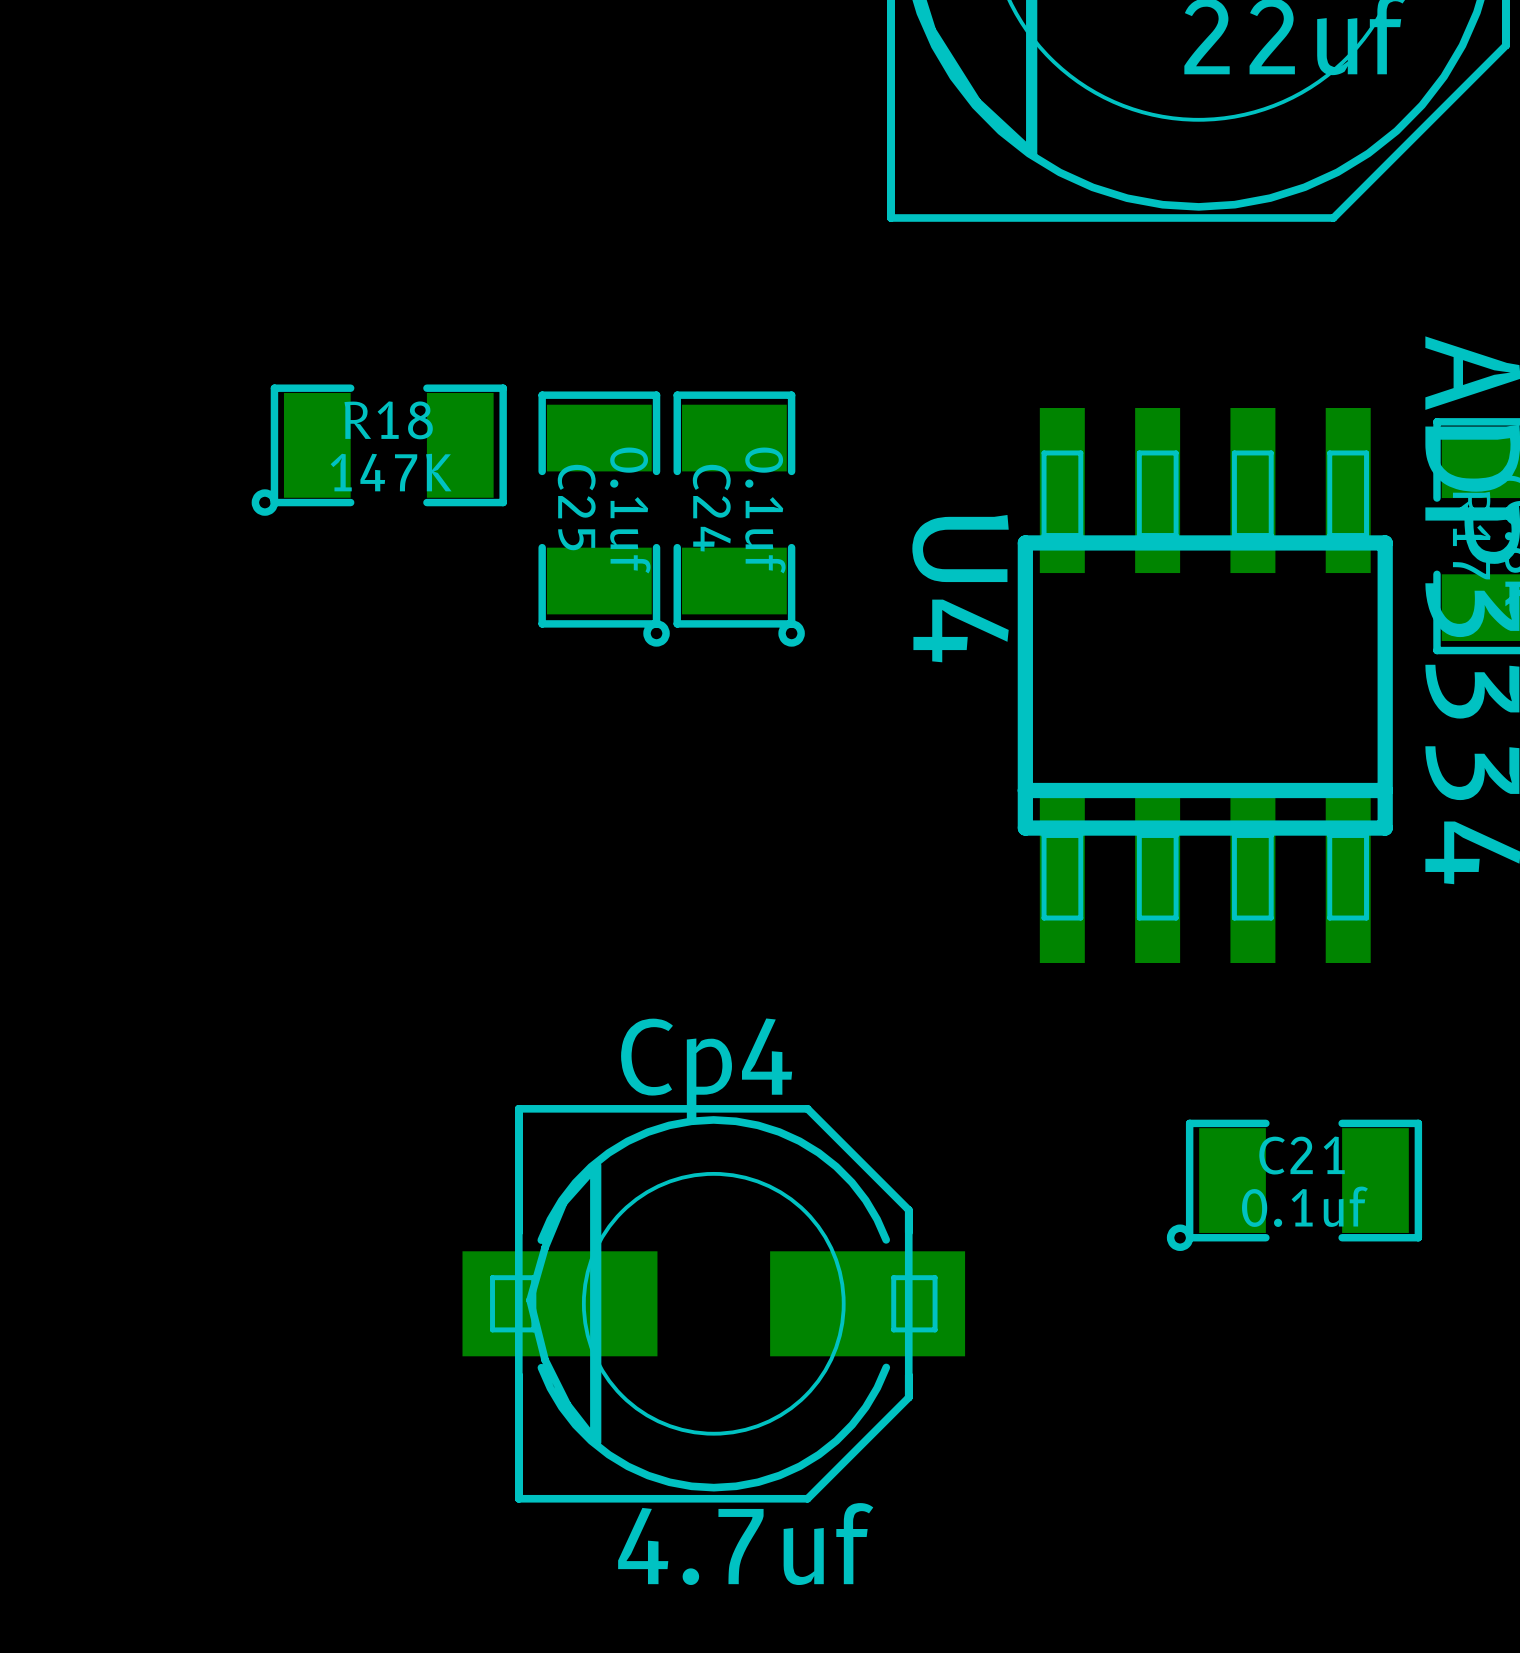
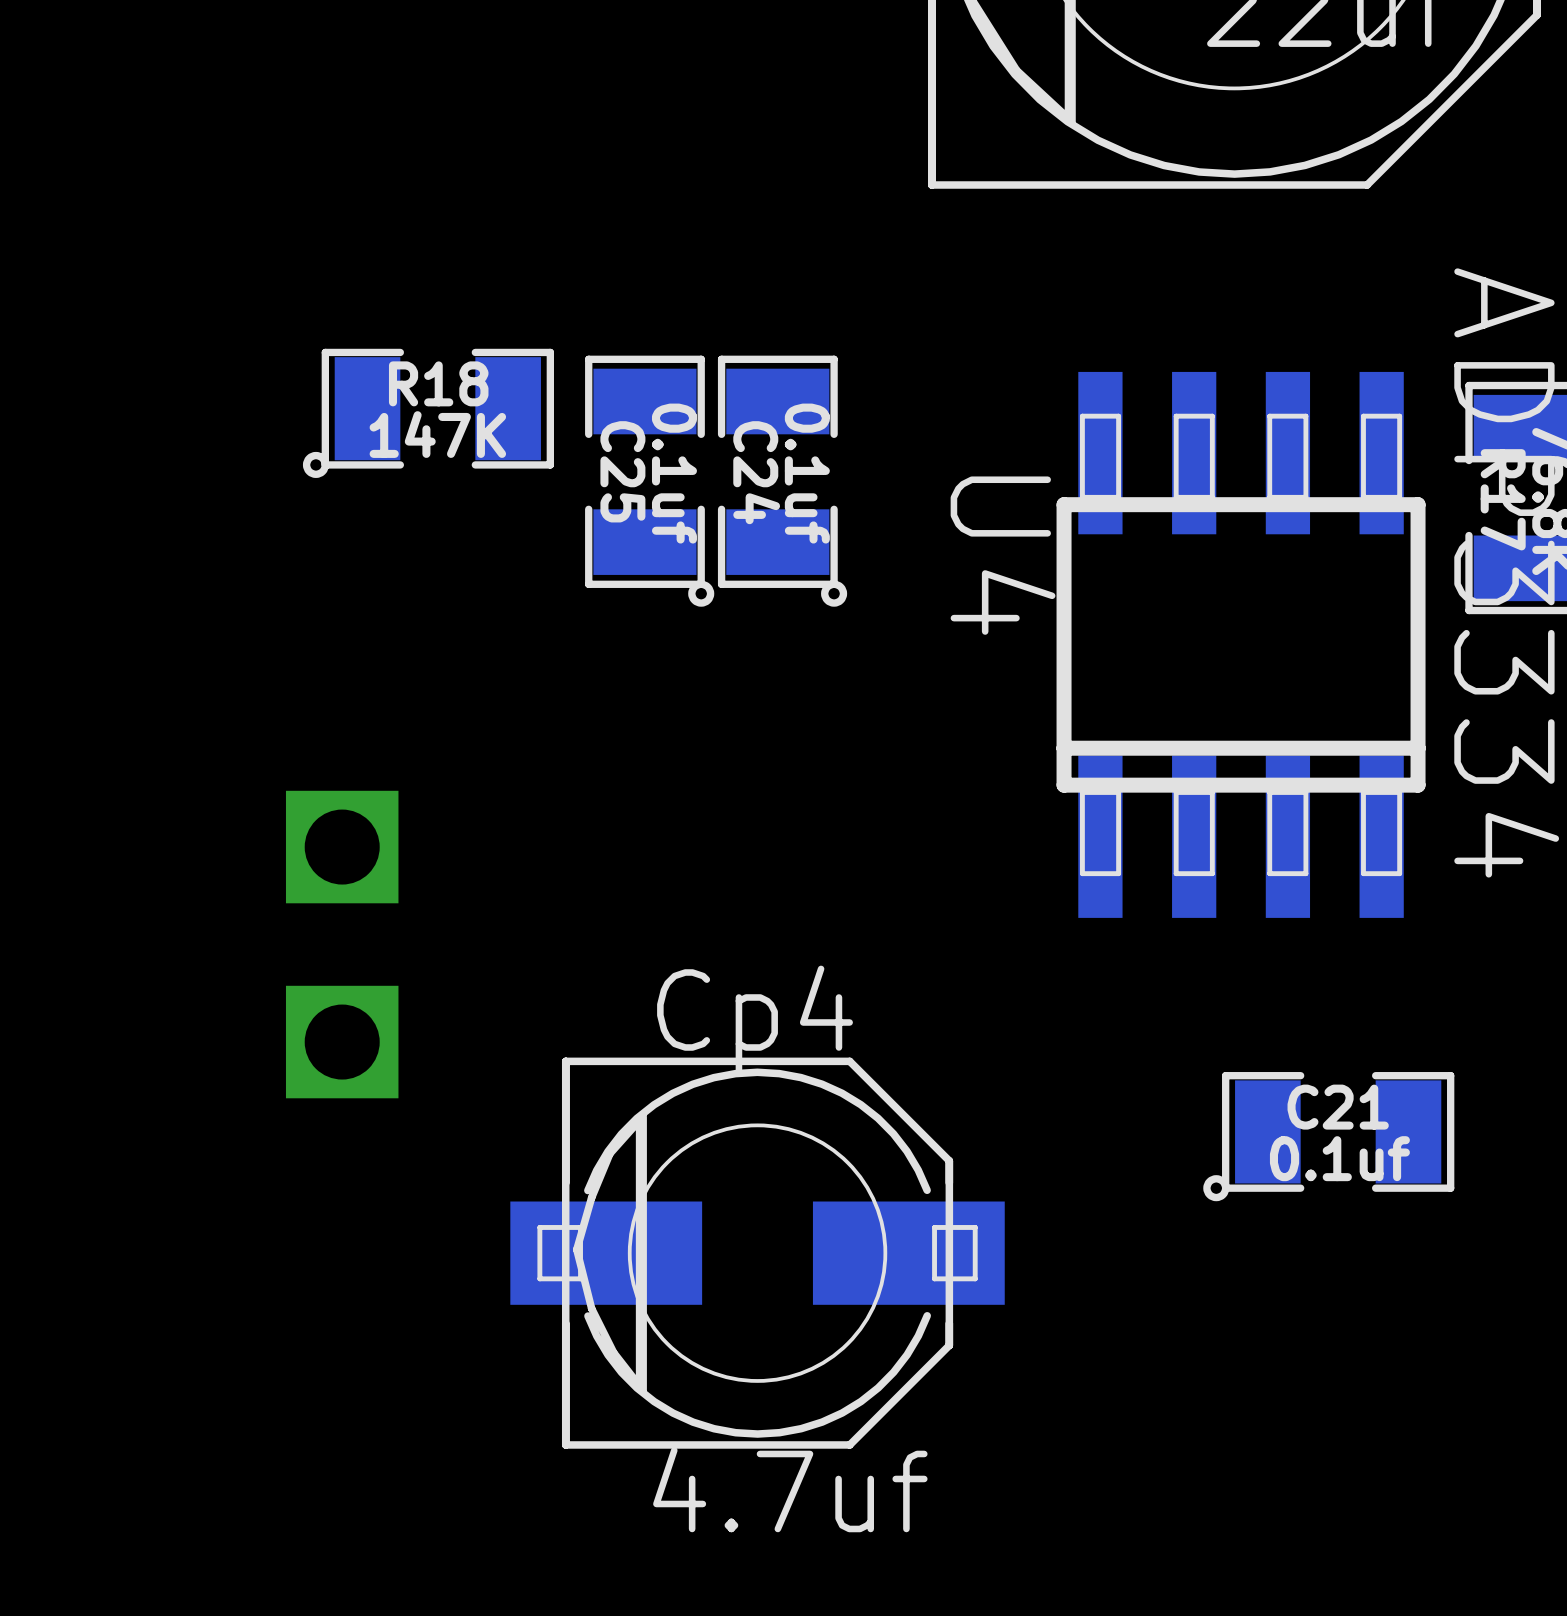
part: none -> (342, 847)
part: none -> (342, 1042)

